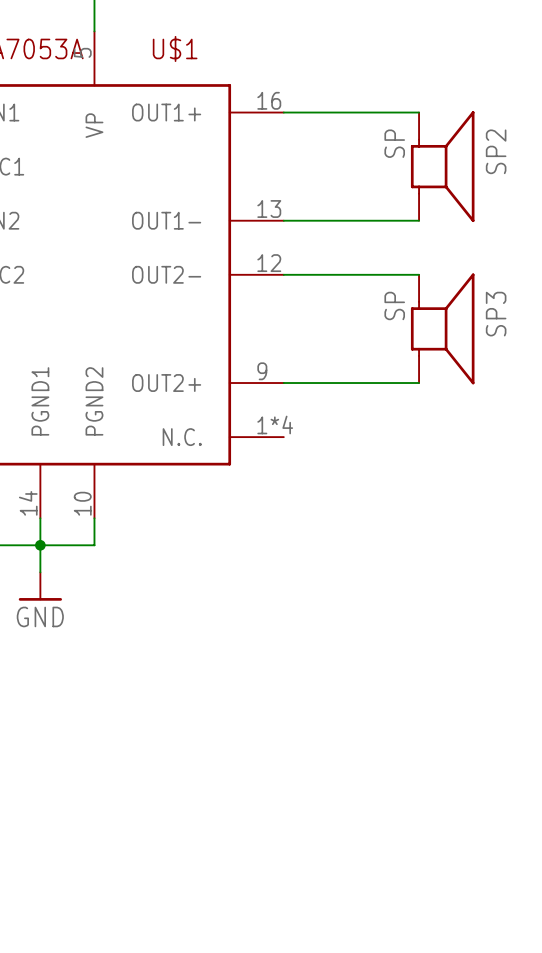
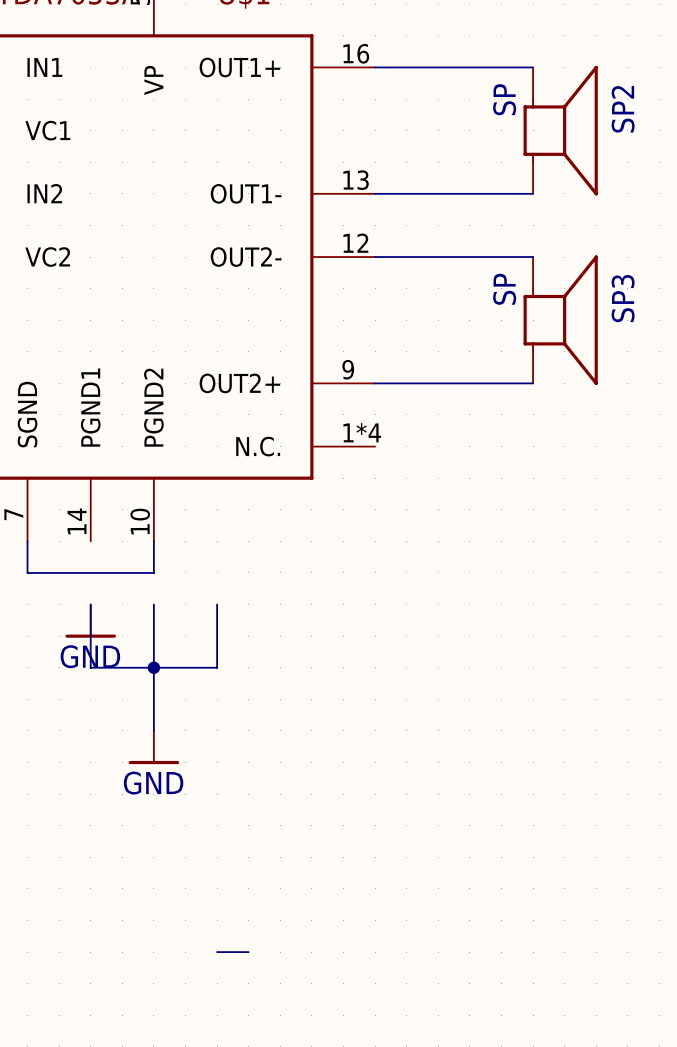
wire: (40, 518) (40, 572) -> (217, 604) (217, 667) (90, 667) (90, 604)
junction: (40, 545) -> none
wire: none -> (153, 604) (153, 730)
junction: none -> (153, 667)
power symbol: none -> GND (153, 747)
wire: none -> (217, 952) (248, 952)

